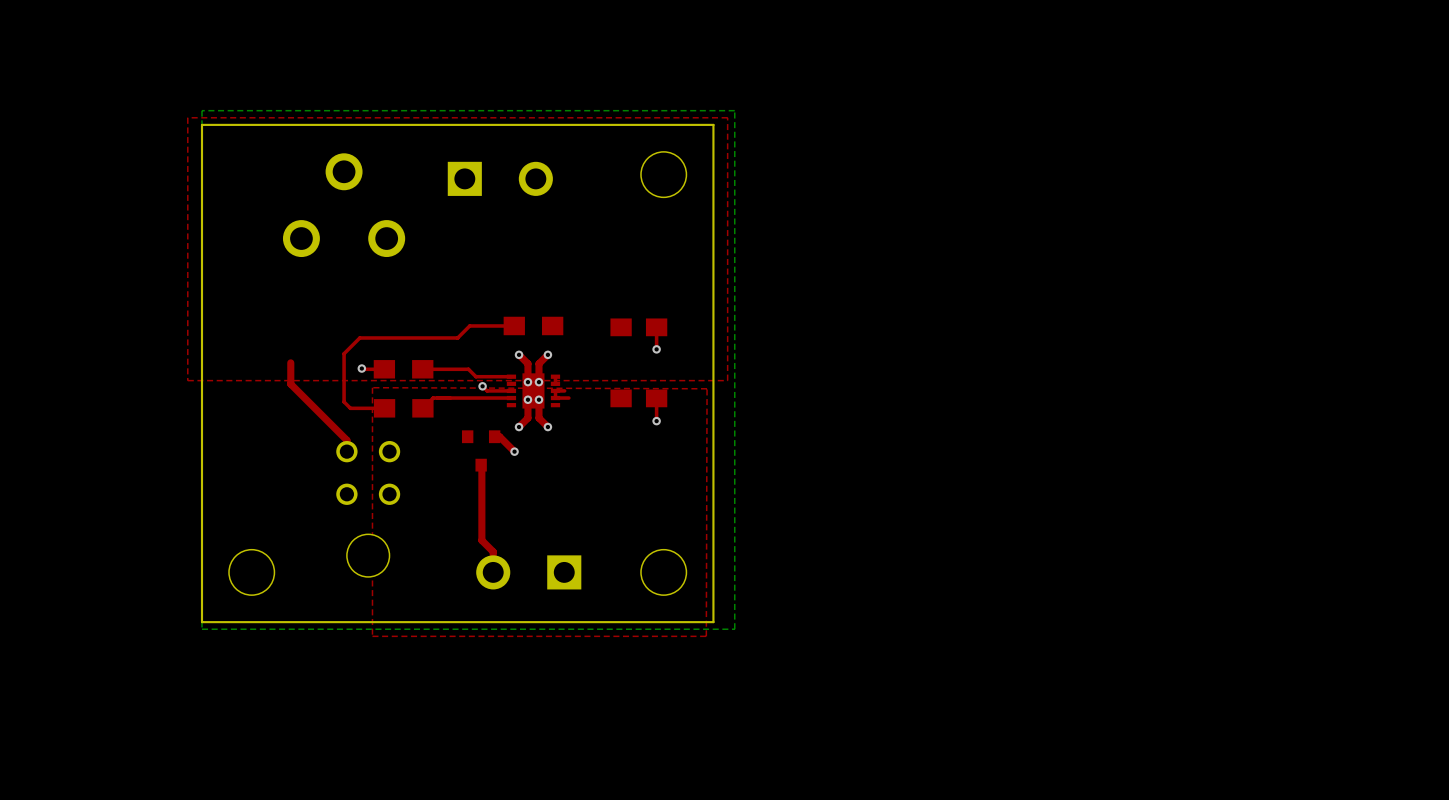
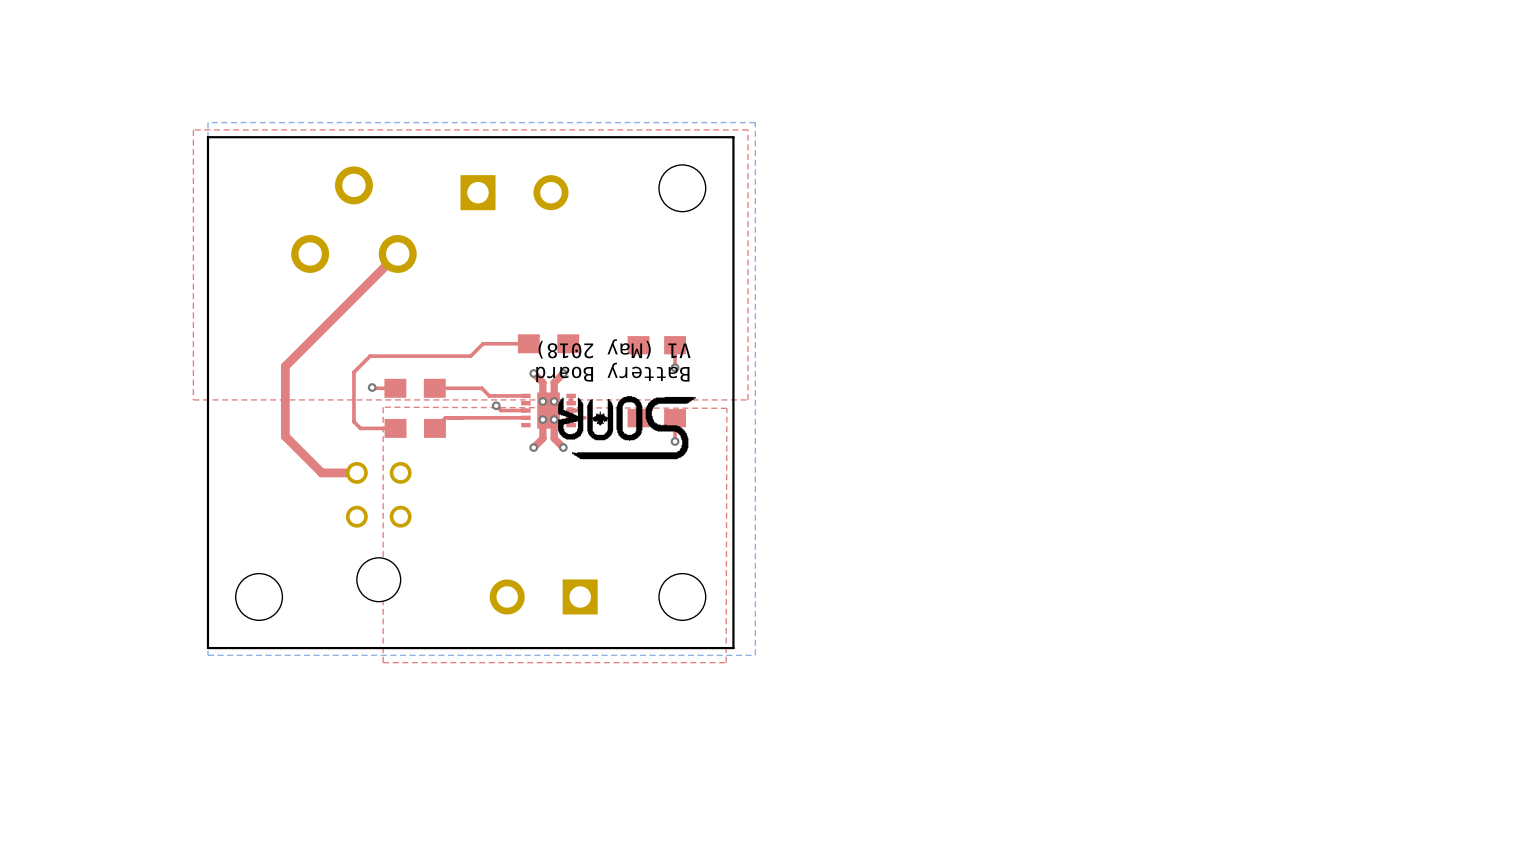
text: none -> V1 (May 2018) (614, 348)
text: none -> Battery Board (612, 372)
top track: (290, 362) (290, 384) (346, 440) (346, 451) -> (397, 253) (285, 366) (285, 436) (321, 472) (356, 472)
drawing: none -> [558, 396, 696, 460]
top track: (494, 436) (499, 436) (514, 451) -> none
part: (481, 450) -> none
via: (514, 451) -> none
top track: (481, 470) (481, 540) (493, 551) (493, 572) -> none

